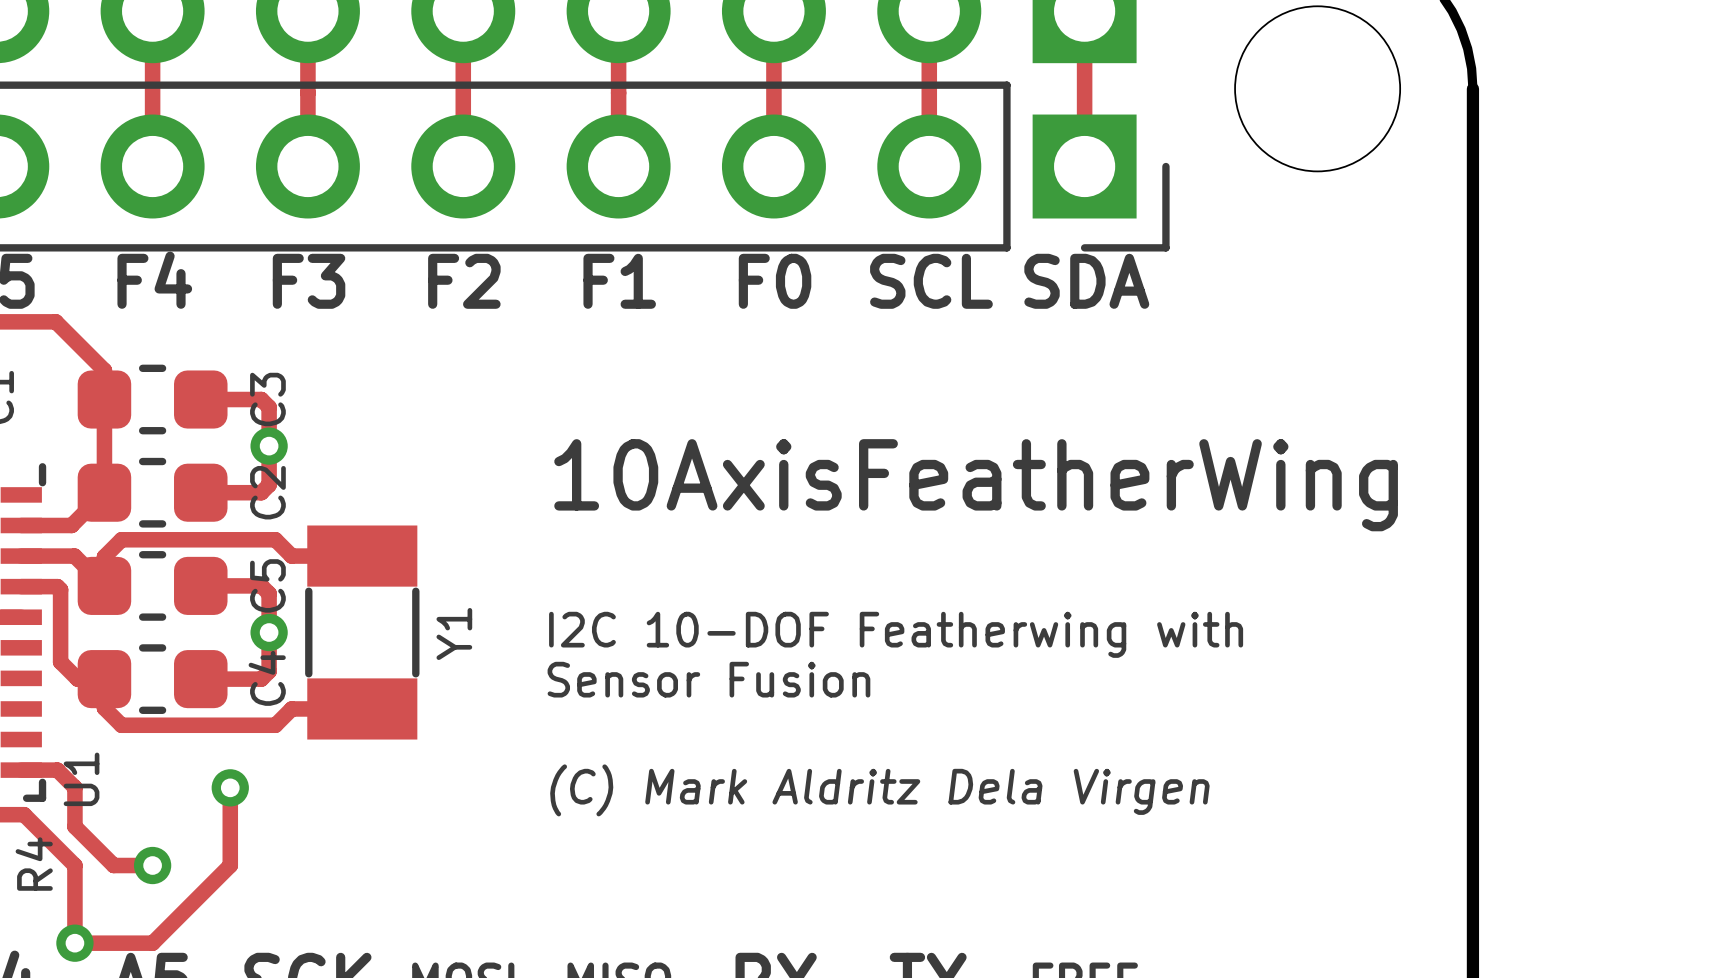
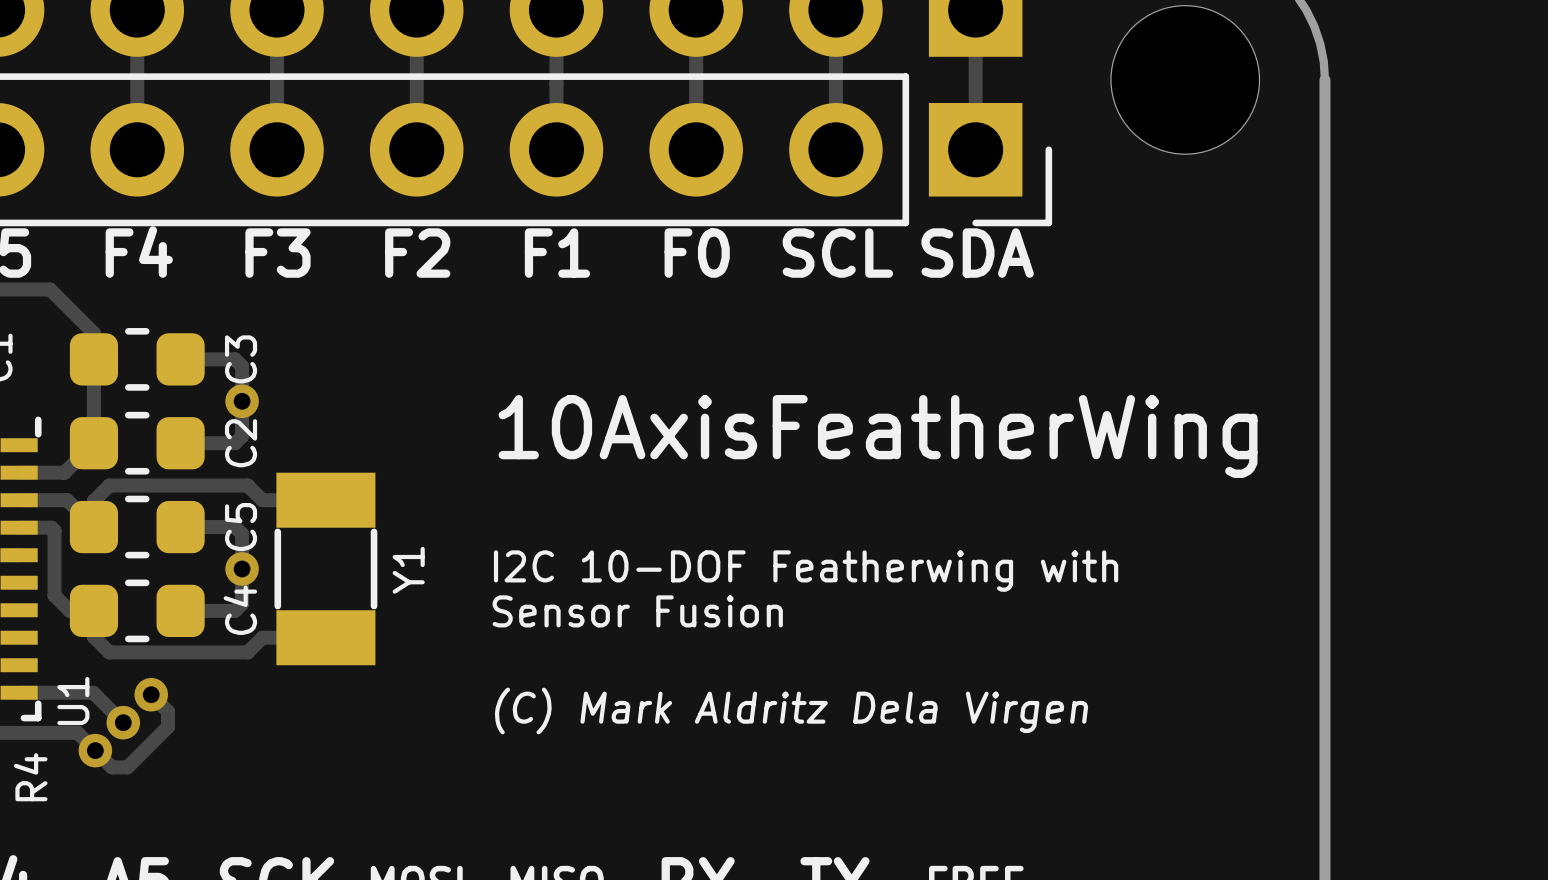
track: (57, 770) (74, 787) (74, 826) (113, 865) (152, 865) -> (51, 692) (93, 692) (123, 722)
via: none -> (151, 694)
track: (230, 787) (230, 865) (152, 943) (74, 943) (74, 865) (24, 814) -> (151, 694) (168, 711) (168, 726) (127, 767) (112, 767) (77, 732) (21, 732)
via: (230, 787) -> none
via: none -> (123, 722)
via: none -> (95, 750)
via: (152, 865) -> none
via: (74, 943) -> none

